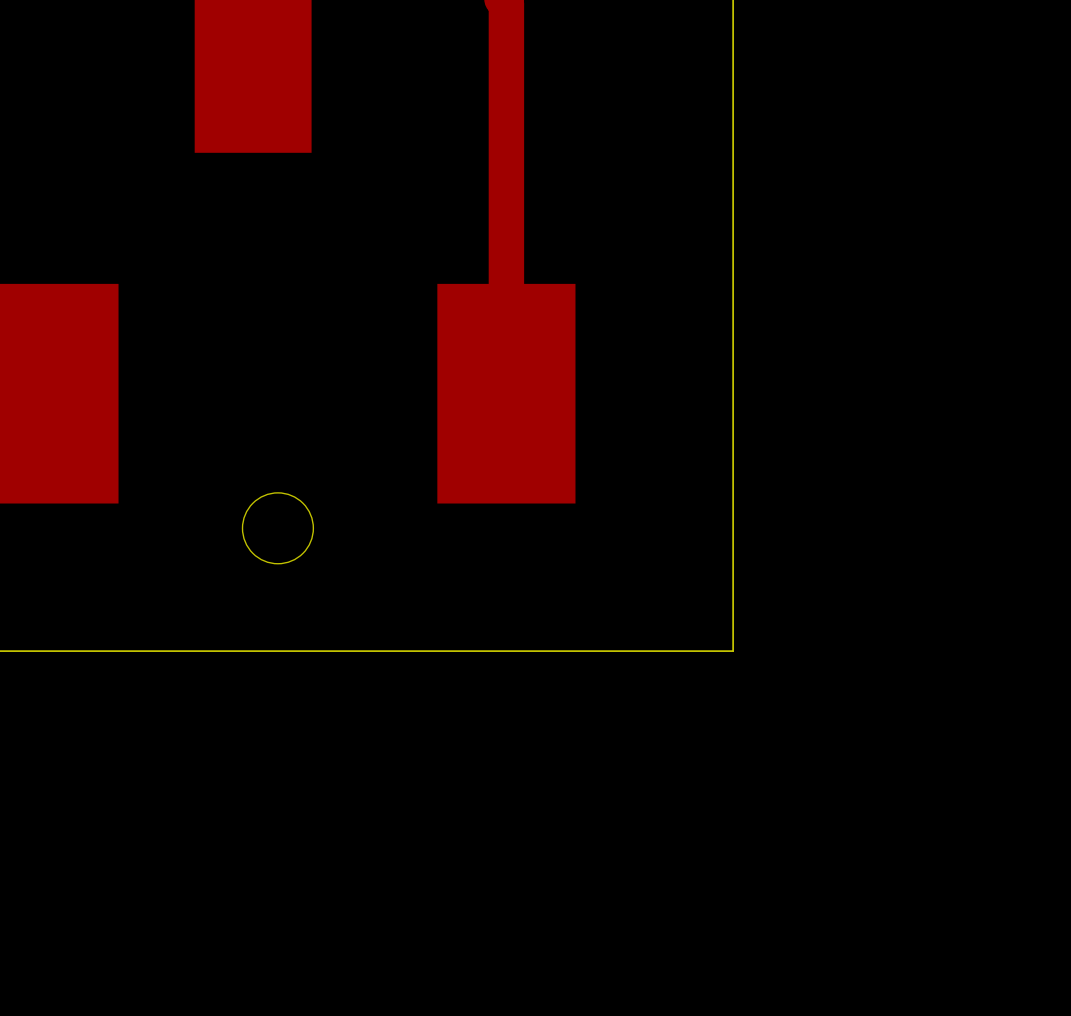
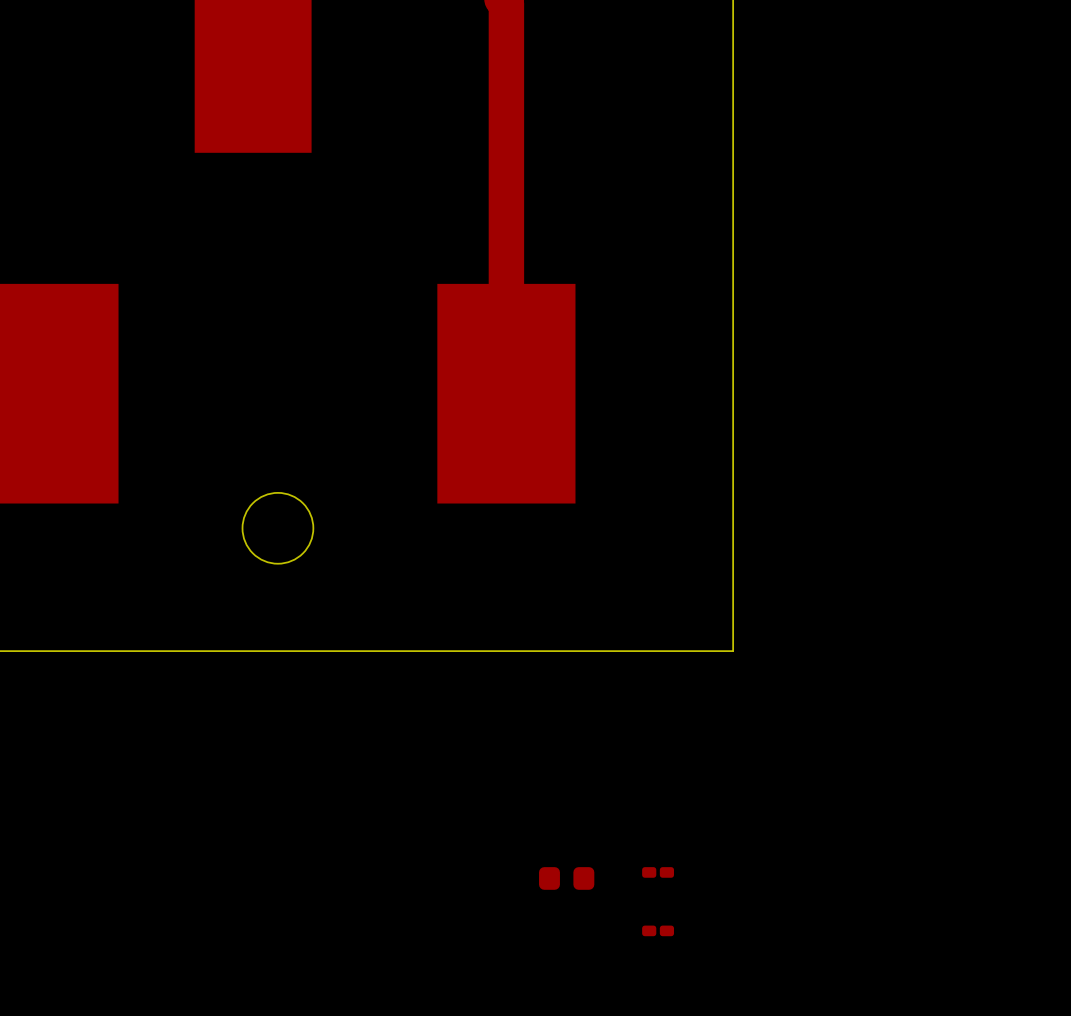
part: none -> (658, 872)
part: none -> (566, 878)
part: none -> (658, 930)

